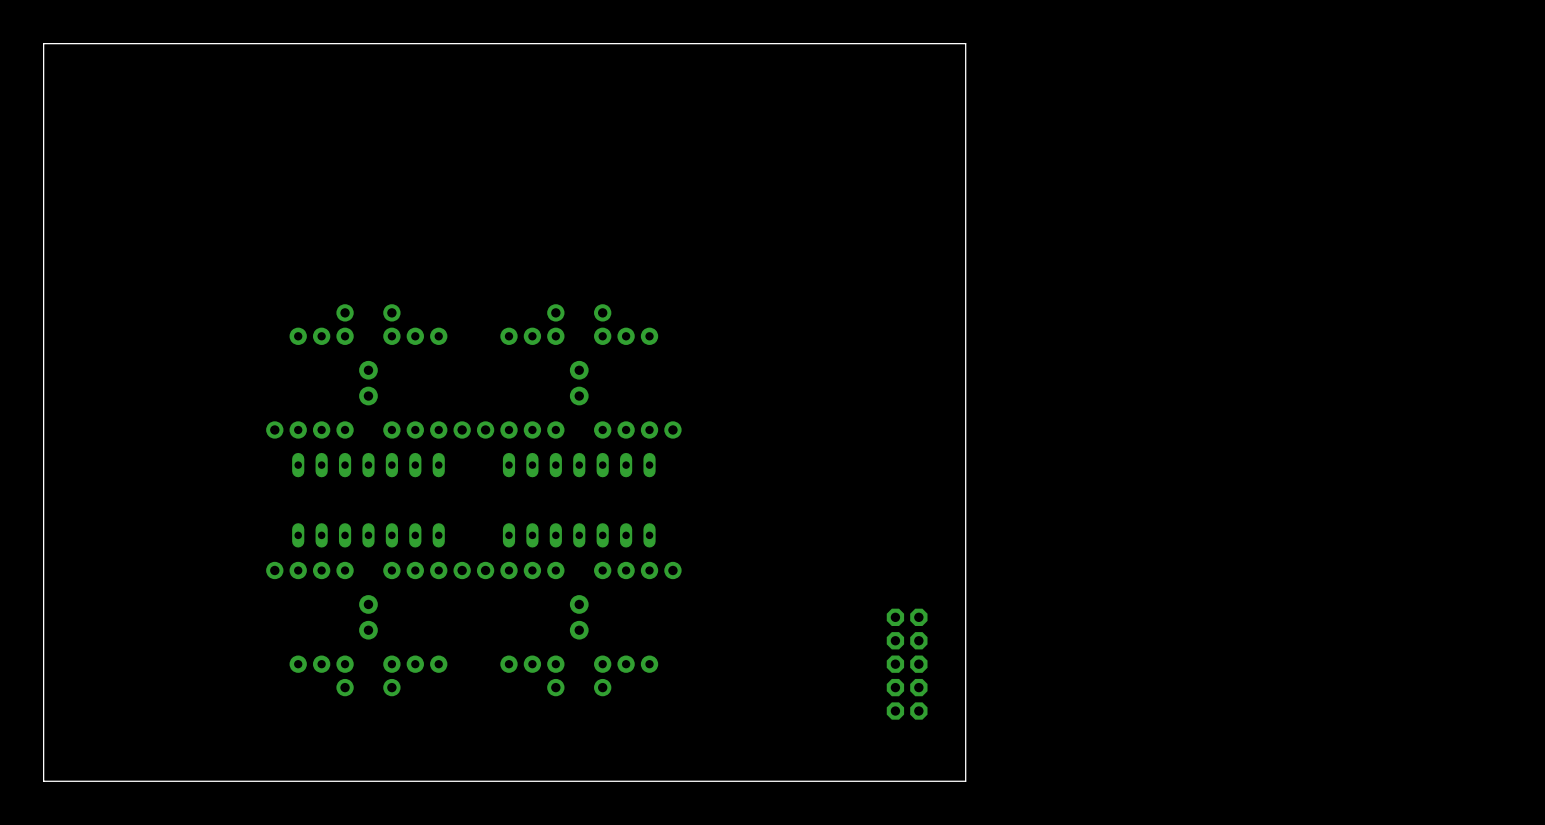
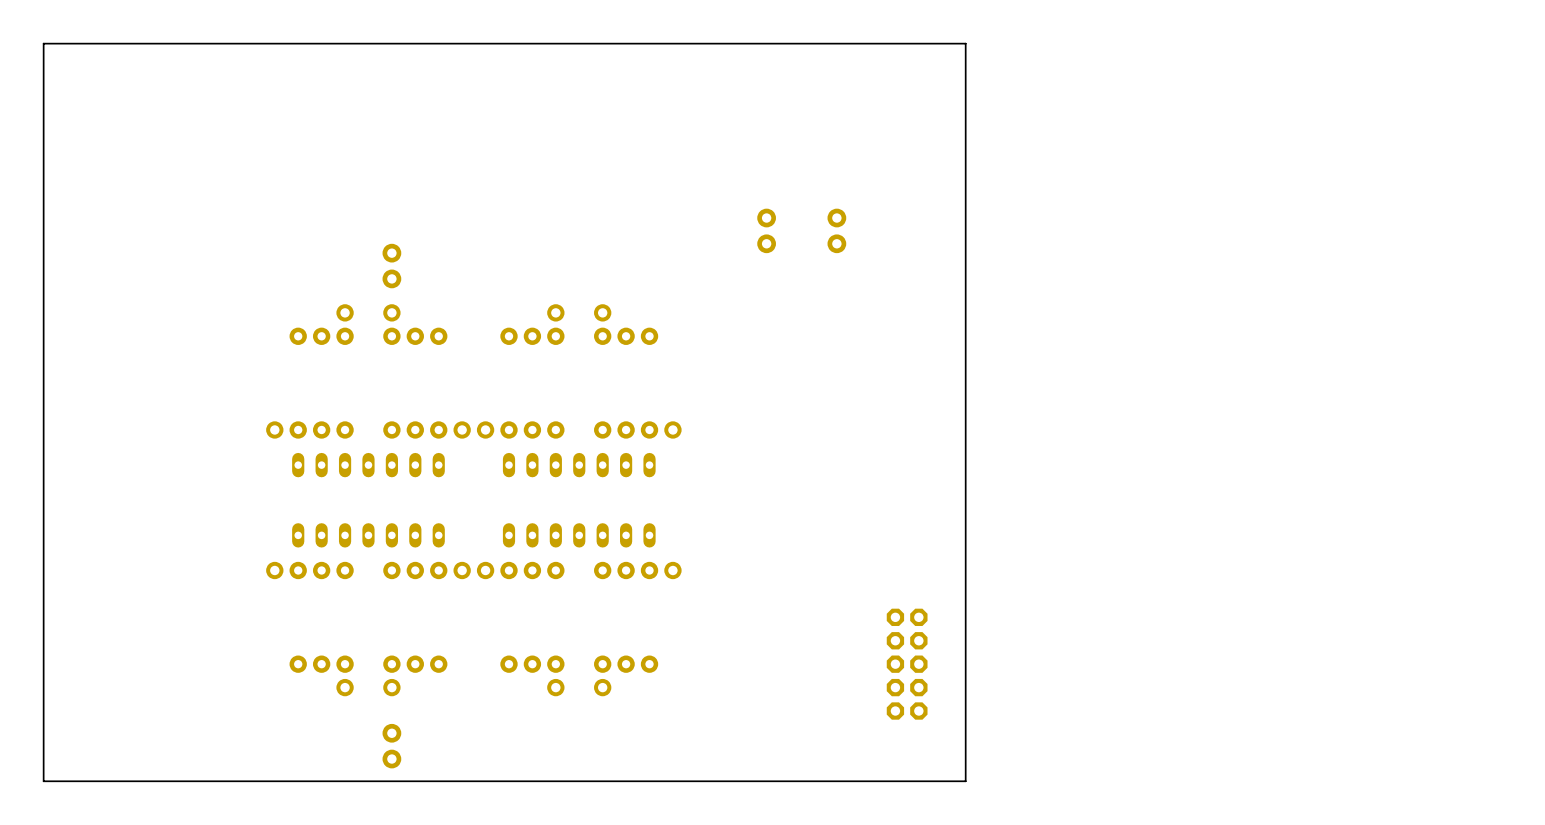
part: none -> (766, 230)
part: none -> (836, 230)
part: none -> (391, 266)
part: (368, 383) -> none
part: (579, 383) -> none
part: (368, 617) -> none
part: (579, 617) -> none
part: none -> (391, 746)

